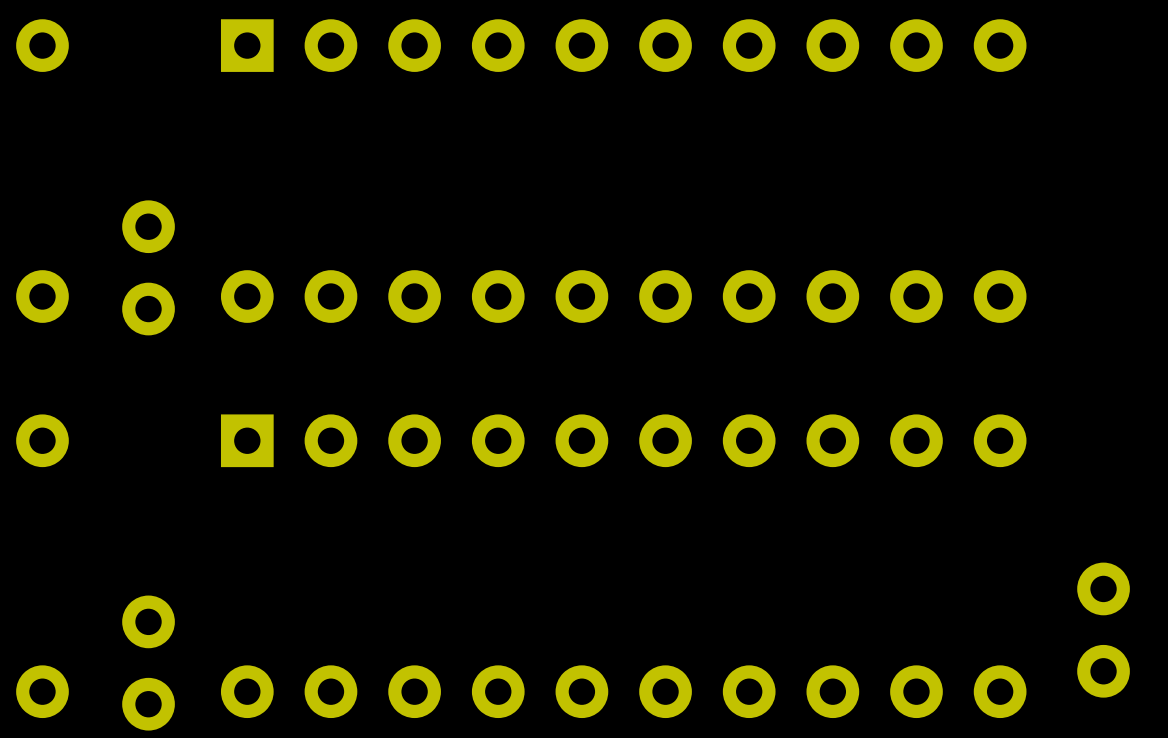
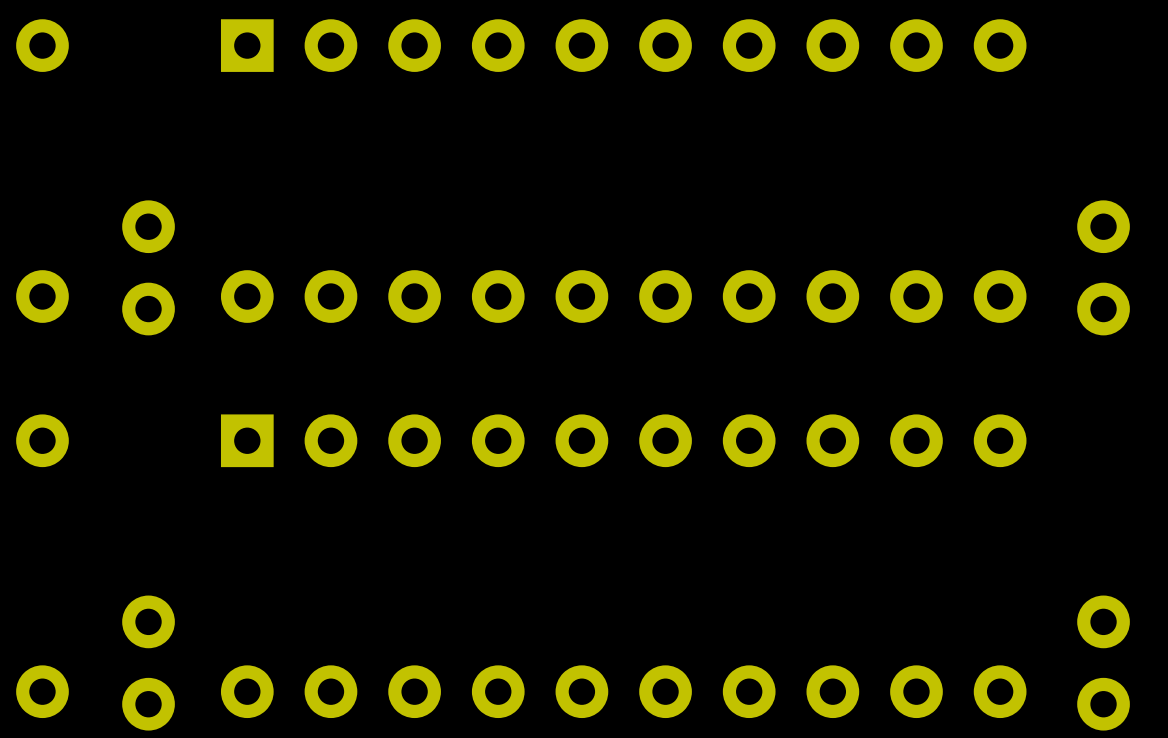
part: none -> (1103, 267)
part position: (1103, 630) -> (1103, 663)

